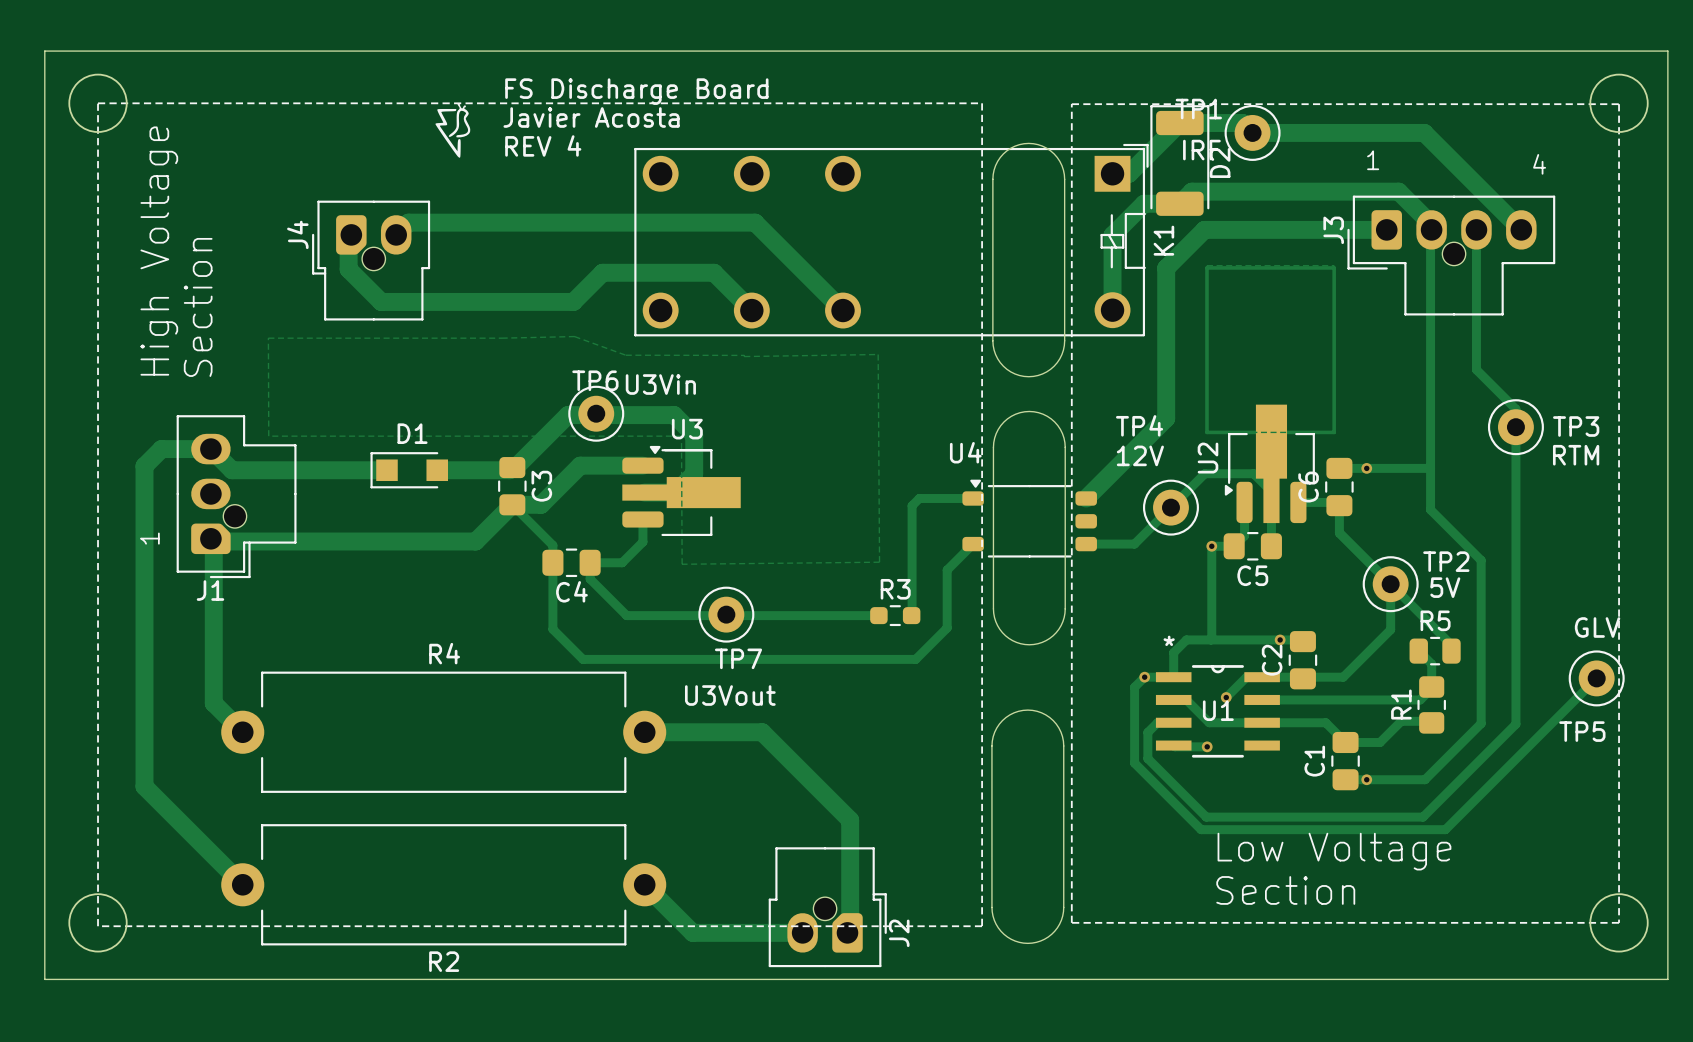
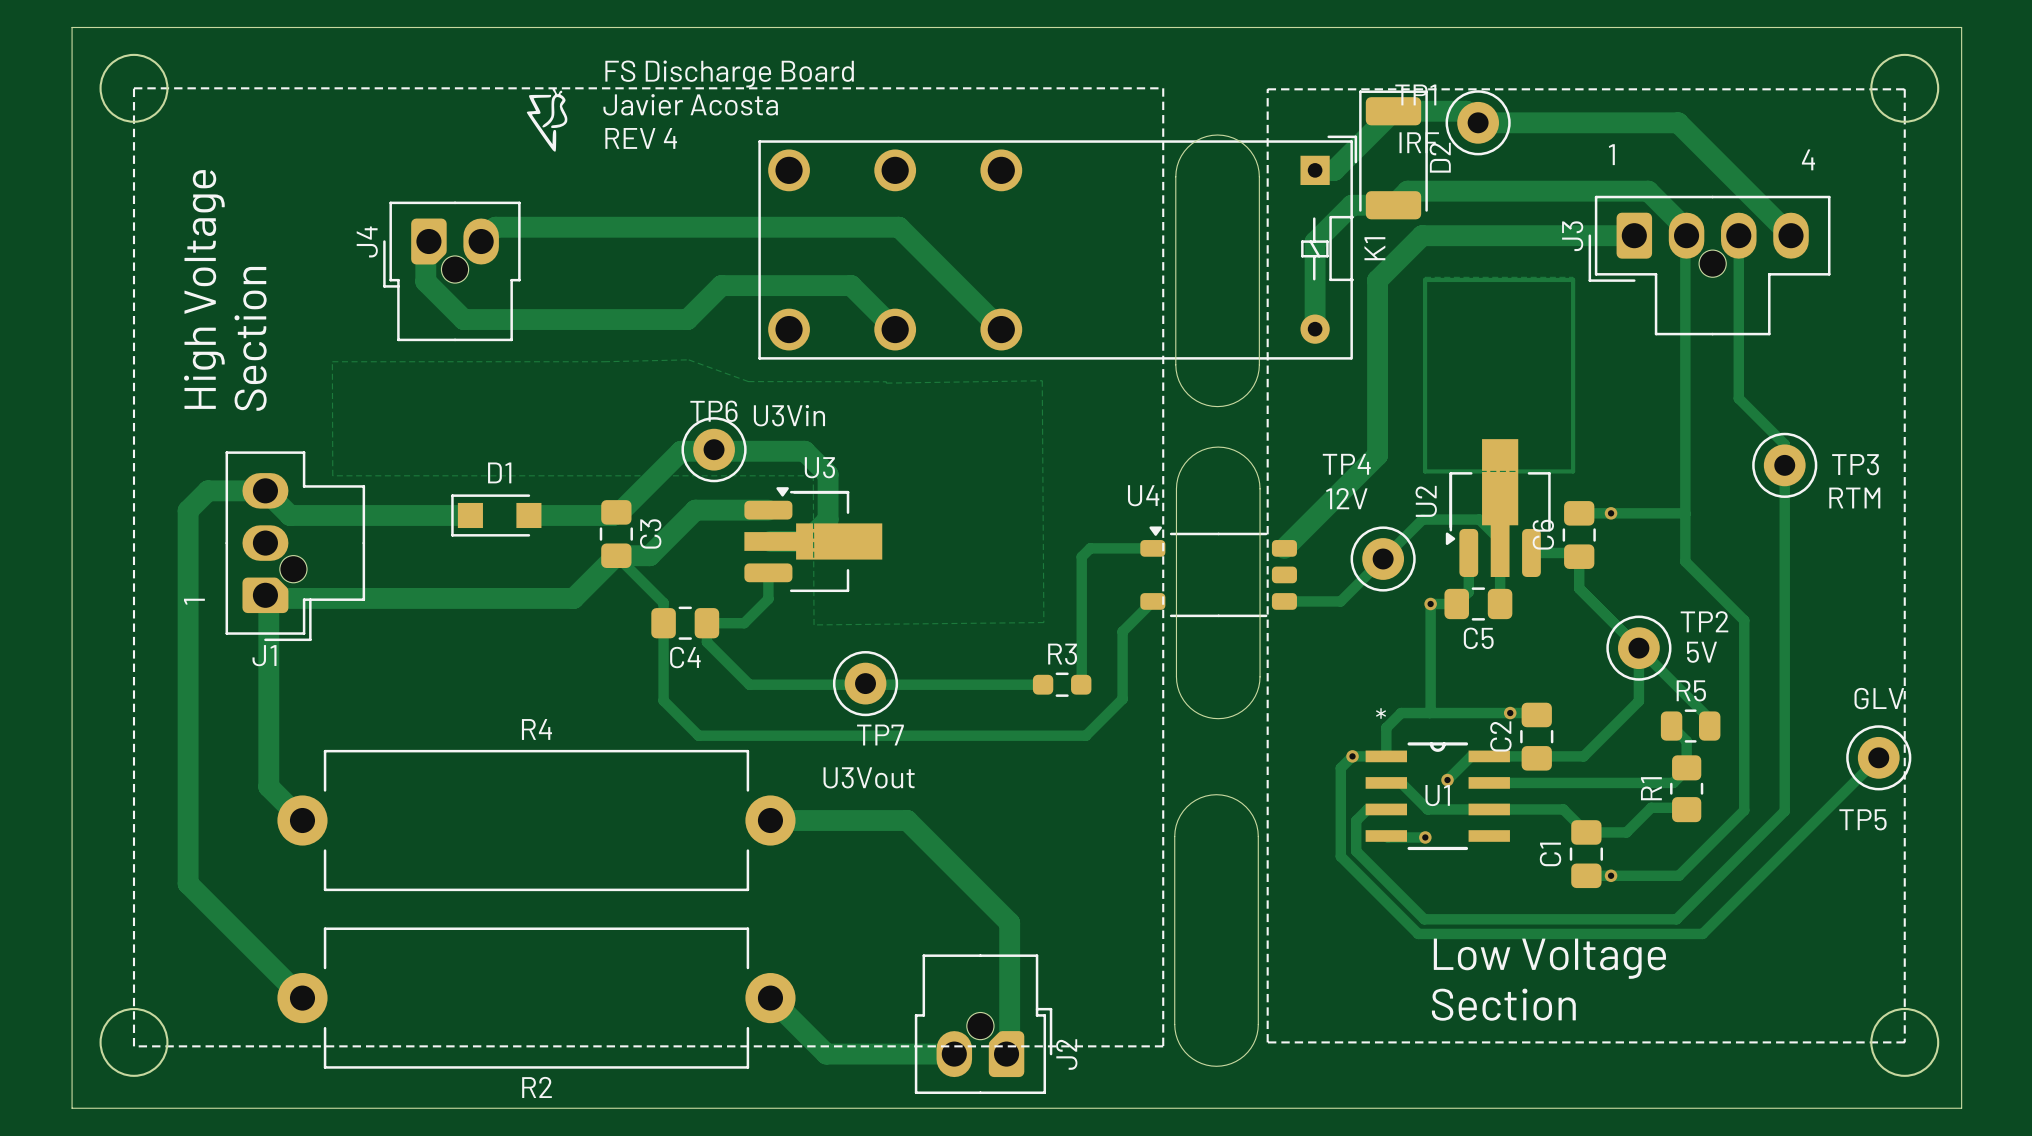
K1 footprint: [634, 143, 1149, 337] -> [758, 135, 1358, 360]

